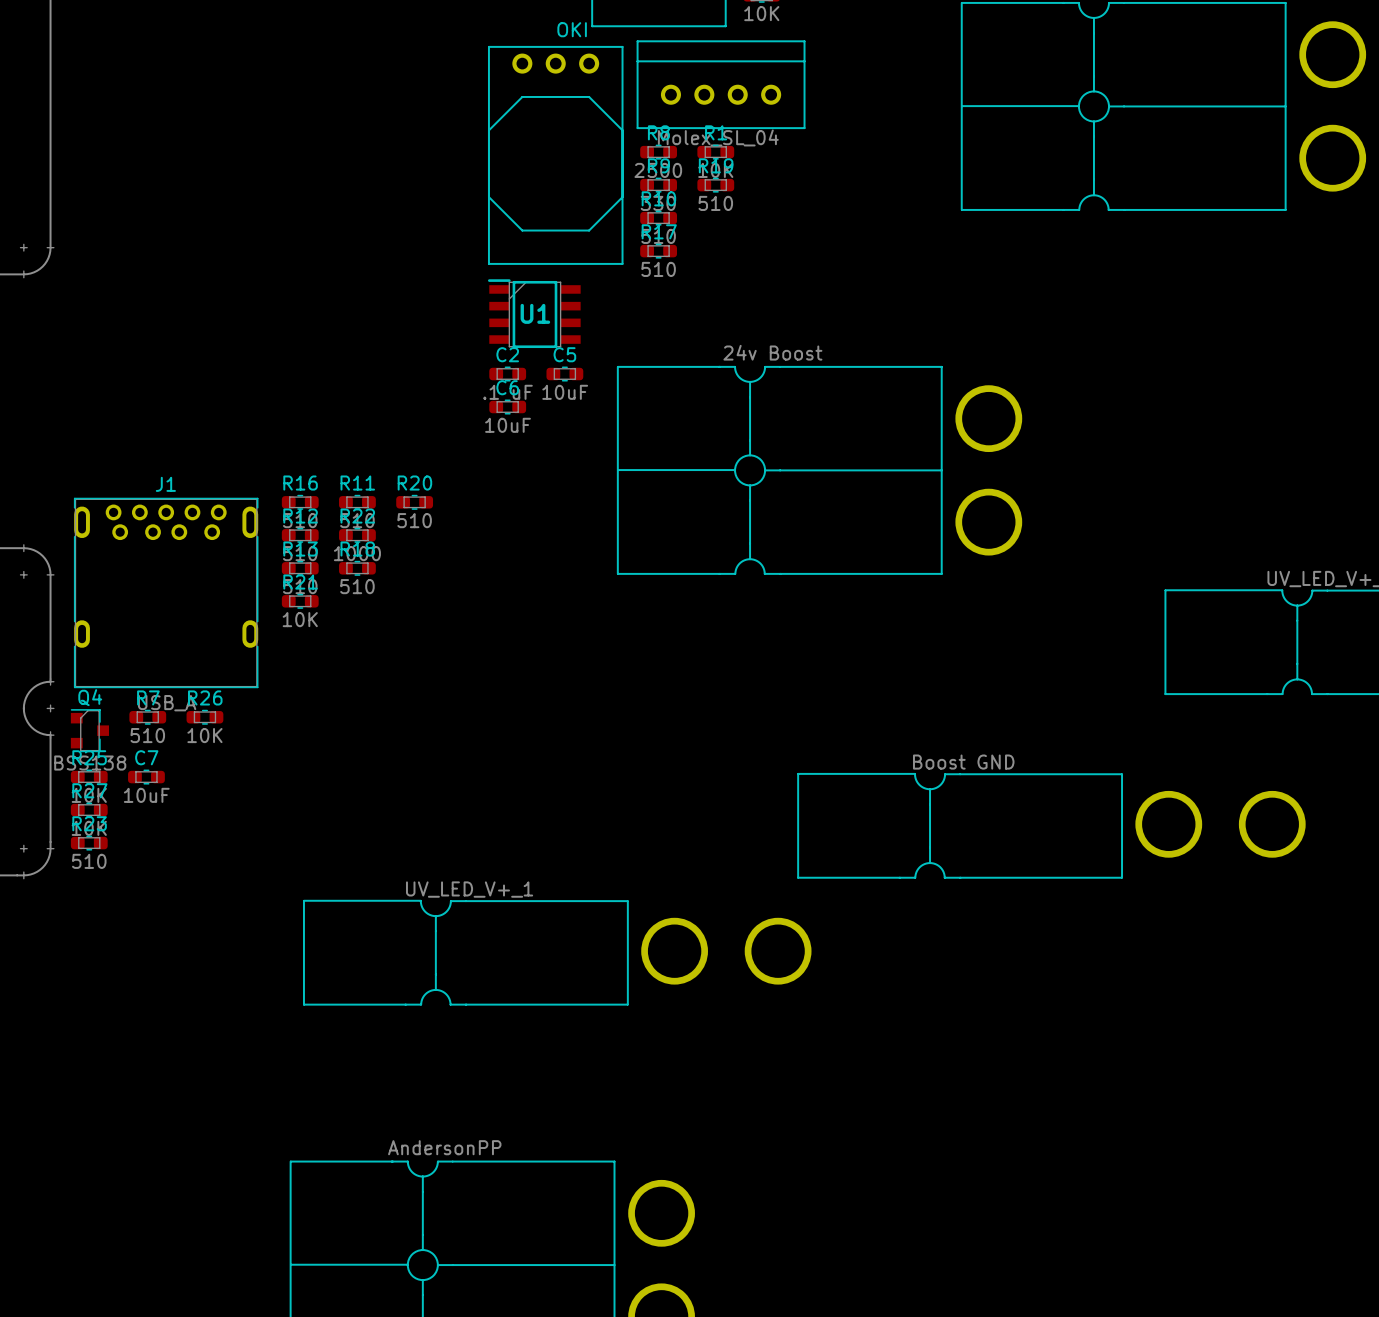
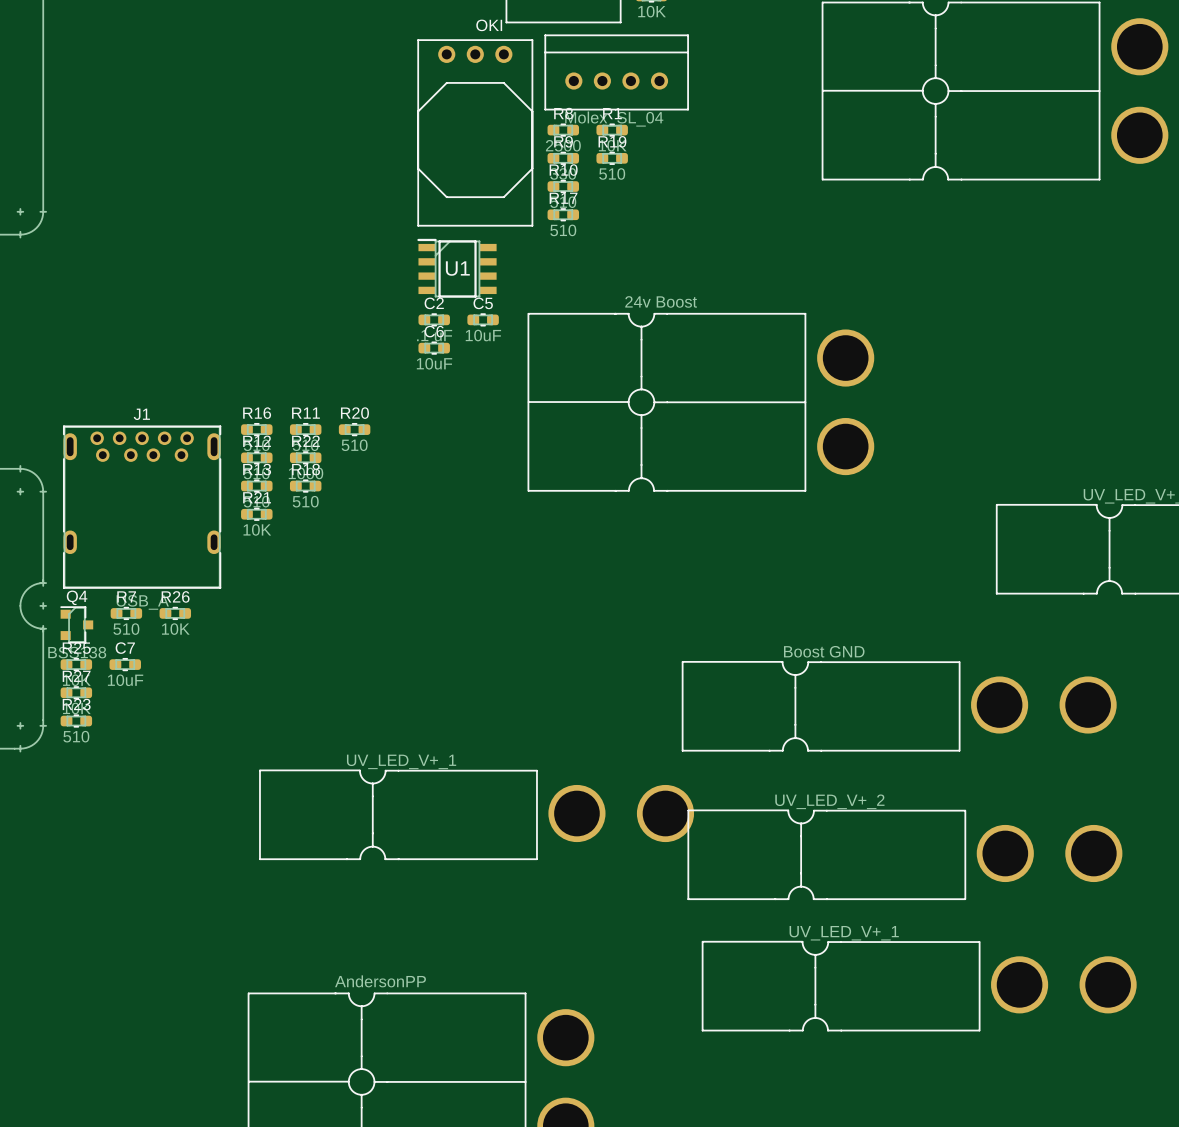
part: none -> UV_LED_V+_2 (904, 854)
part: none -> UV_LED_V+_1 (919, 986)

